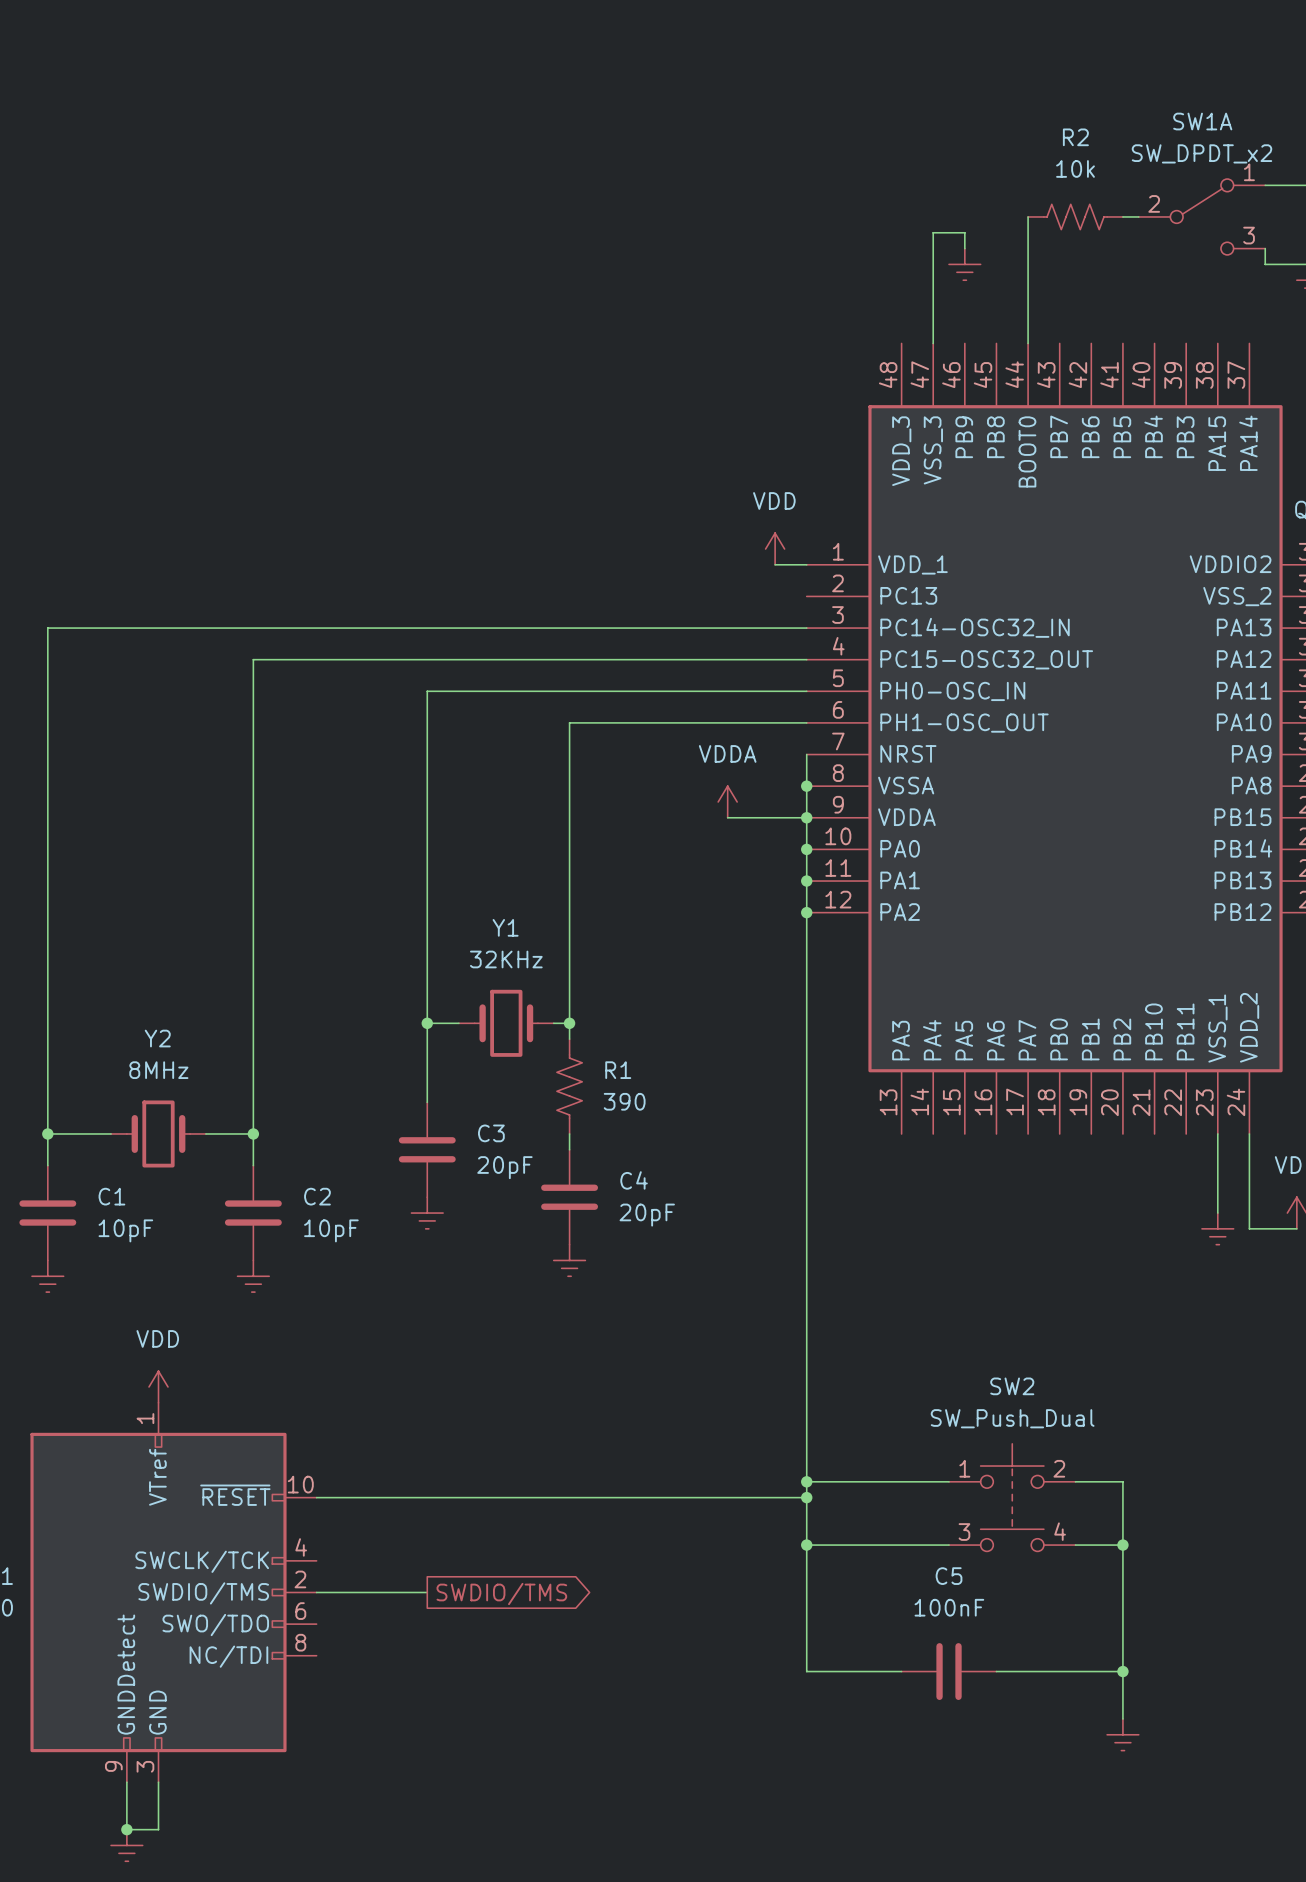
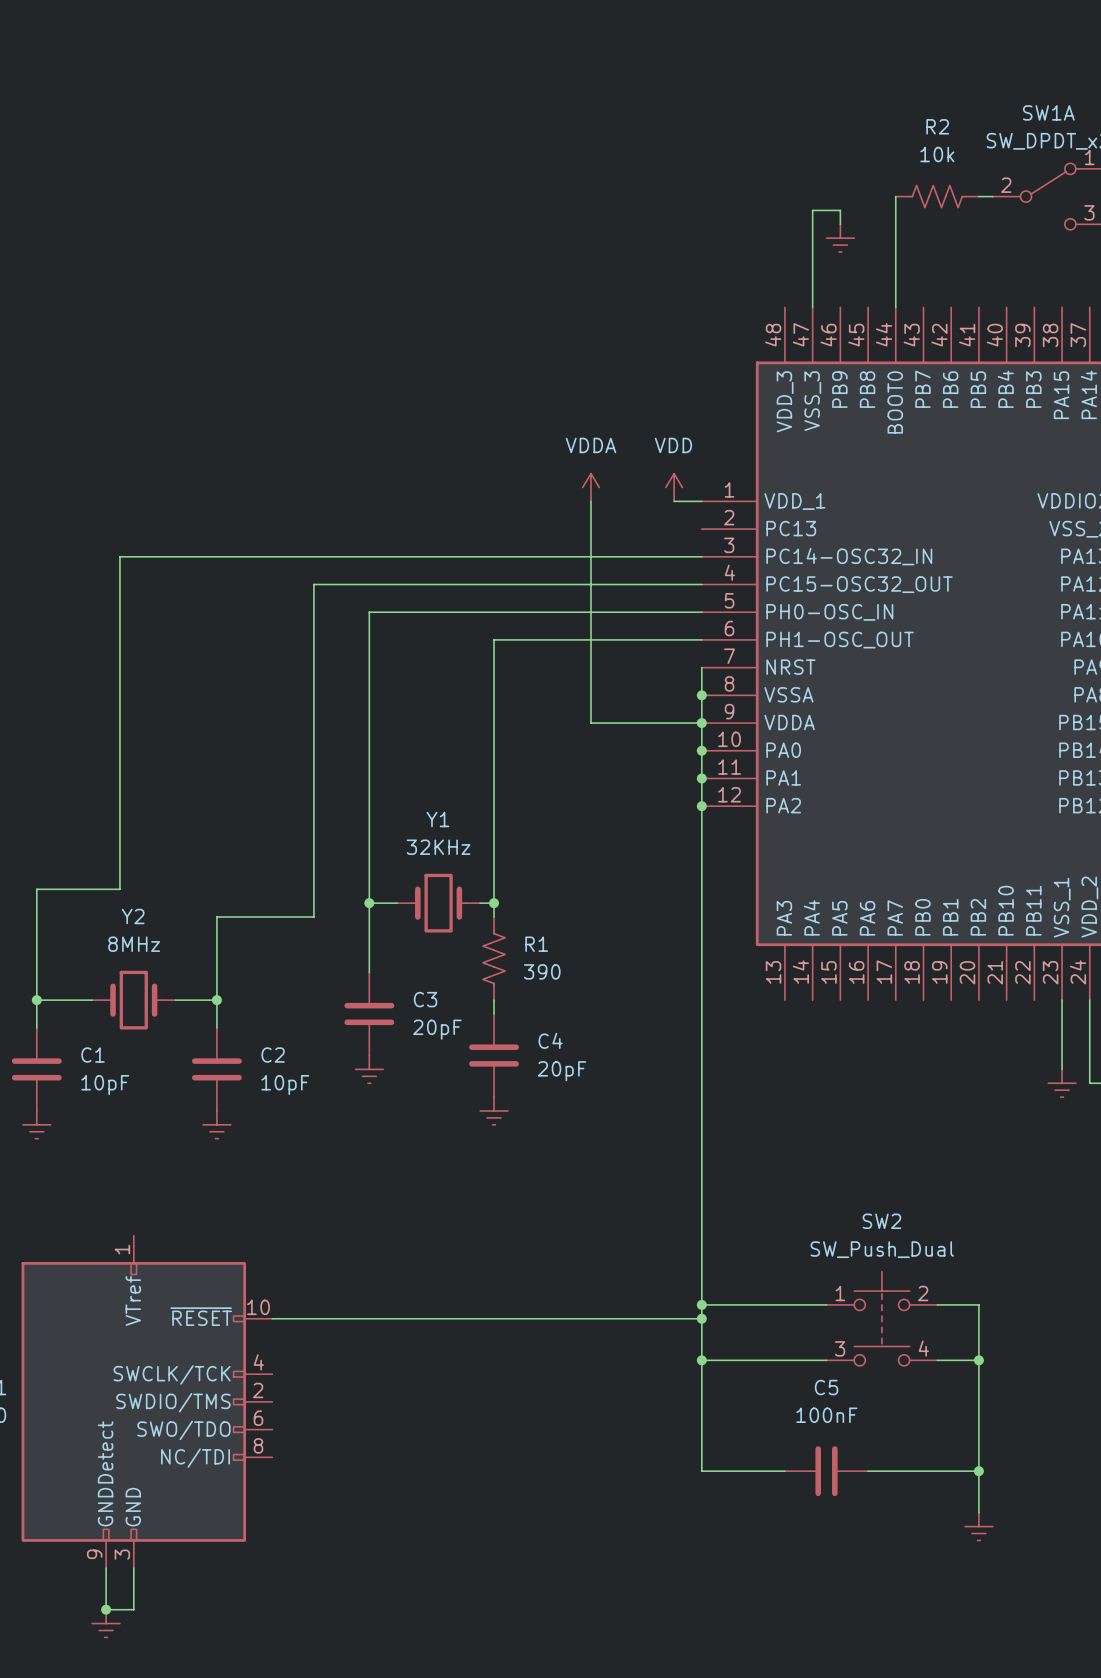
wire: none -> (590, 501) (590, 723) (632, 723)
wire: (142, 628) (47, 628) (47, 1007) -> (119, 556) (119, 889) (36, 889)
wire: (364, 659) (253, 659) (253, 1039) -> (313, 584) (313, 917) (216, 917)
power symbol position: VDDA (727, 801) -> VDDA (590, 487)
power symbol: VDD (158, 1386) -> none
wire: (316, 1592) (427, 1592) -> none
global label: SWDIO/TMS (501, 1594) -> none

